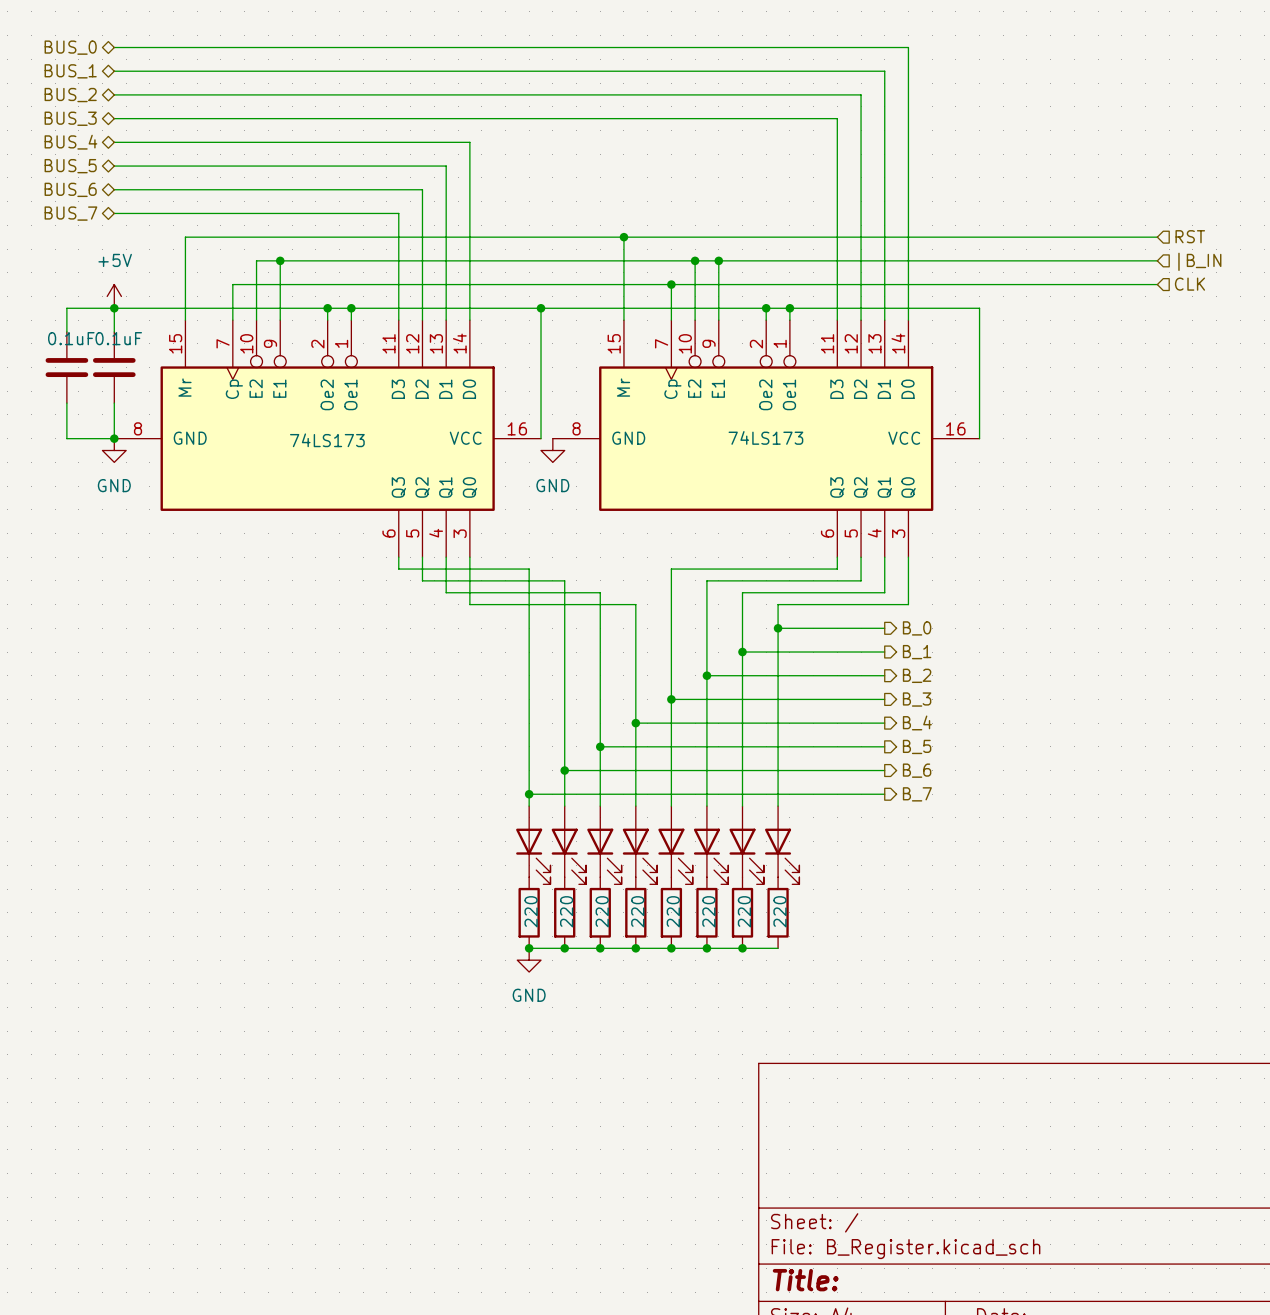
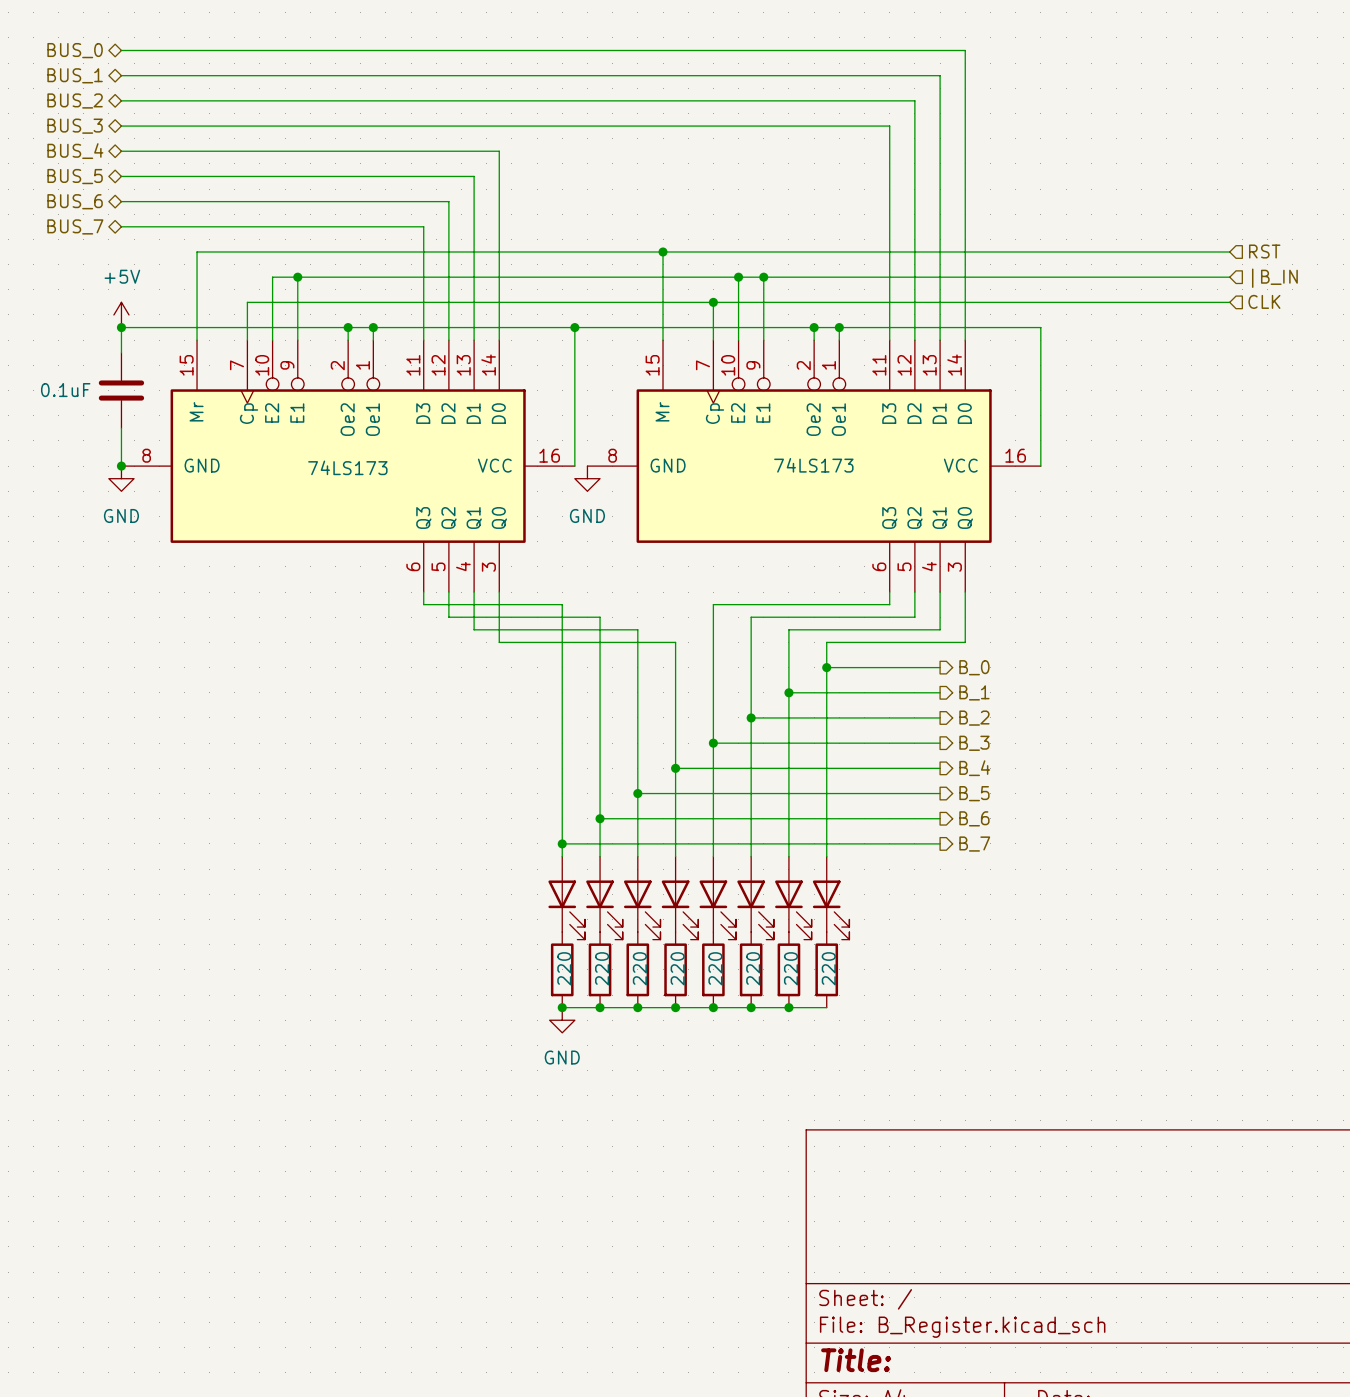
wire: (114, 308) (66, 308) (66, 331) -> none
part value position: 0.1uF (118, 338) -> 0.1uF (65, 390)
part: 0.1uF (66, 367) -> none
wire: (66, 403) (66, 438) (114, 438) -> none

